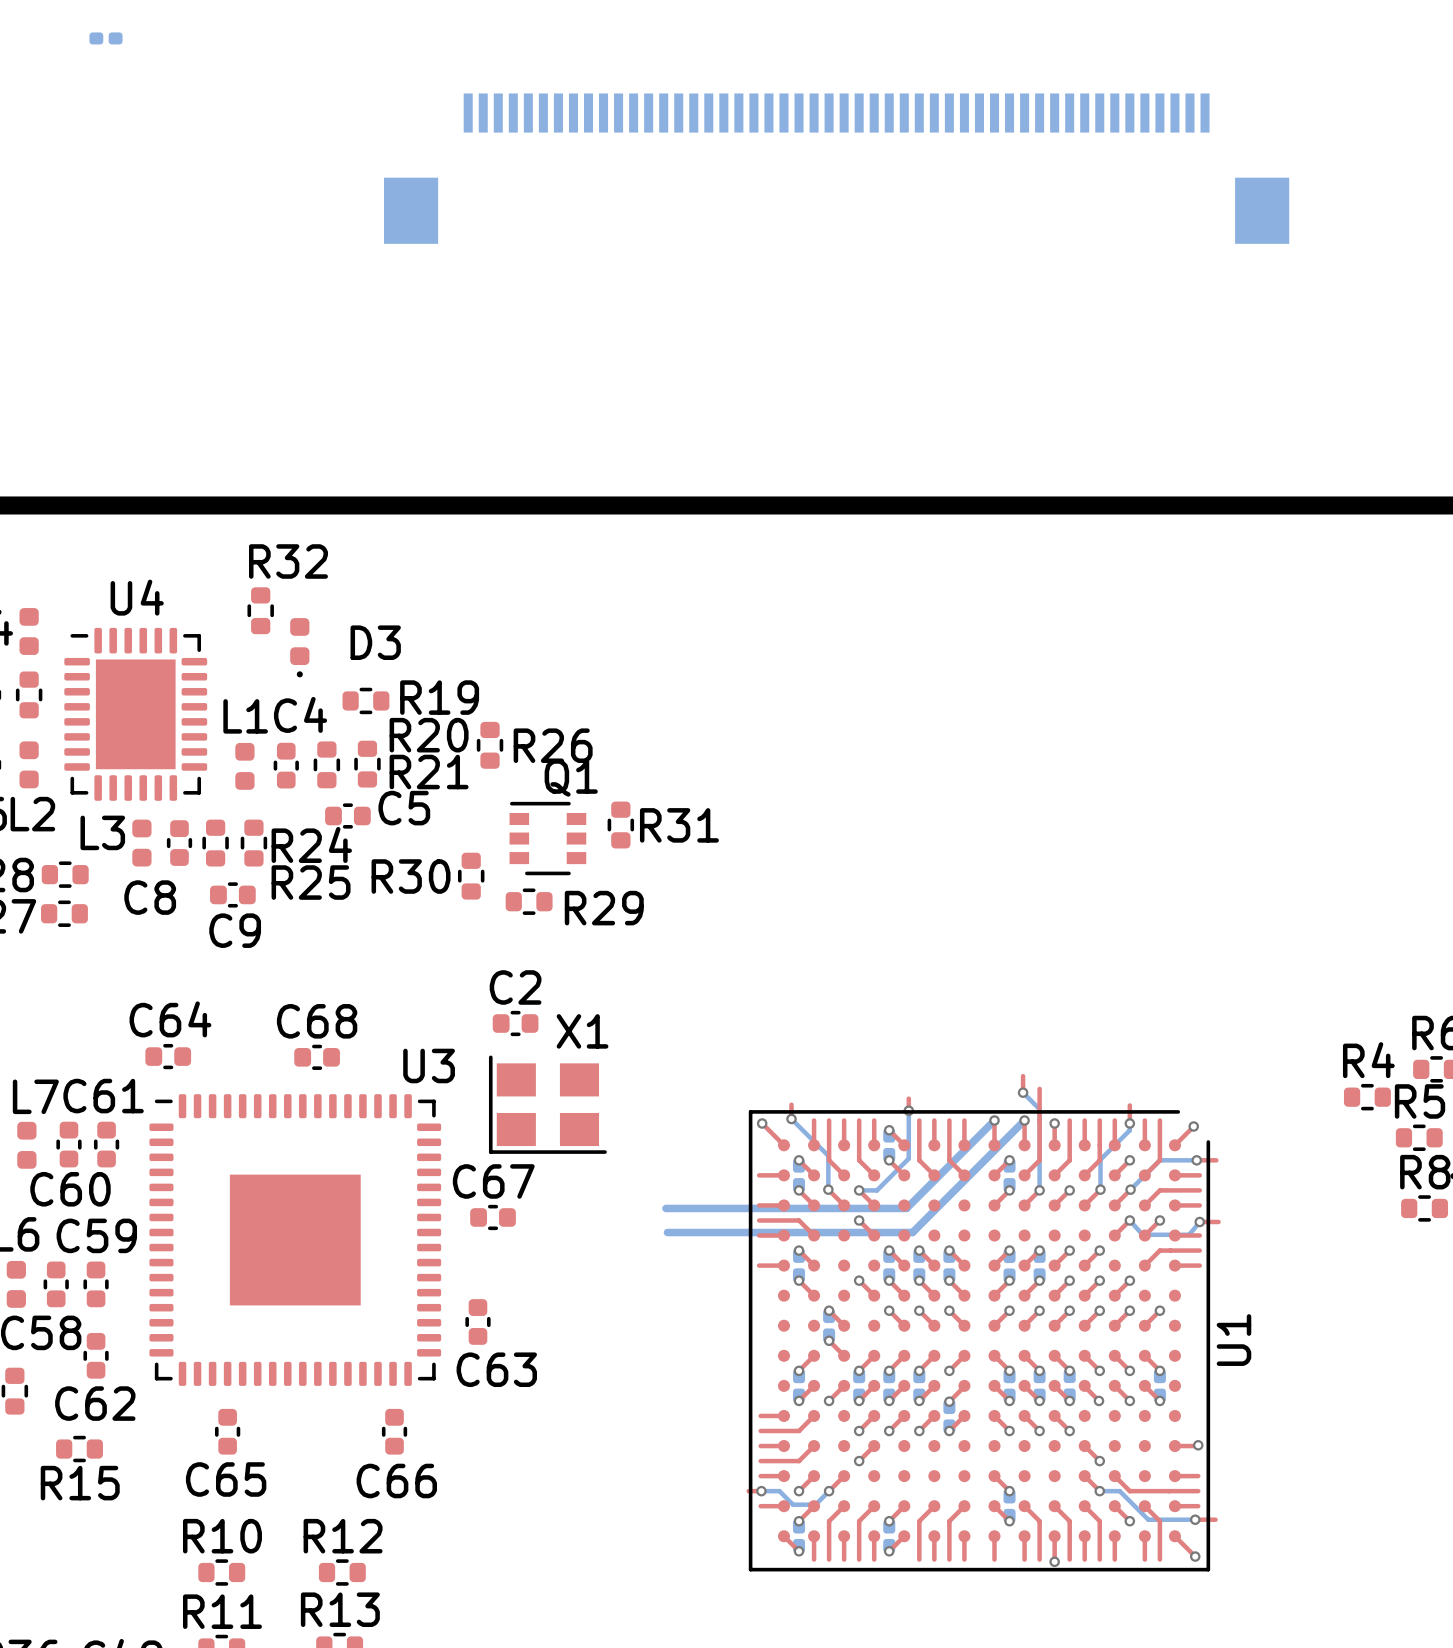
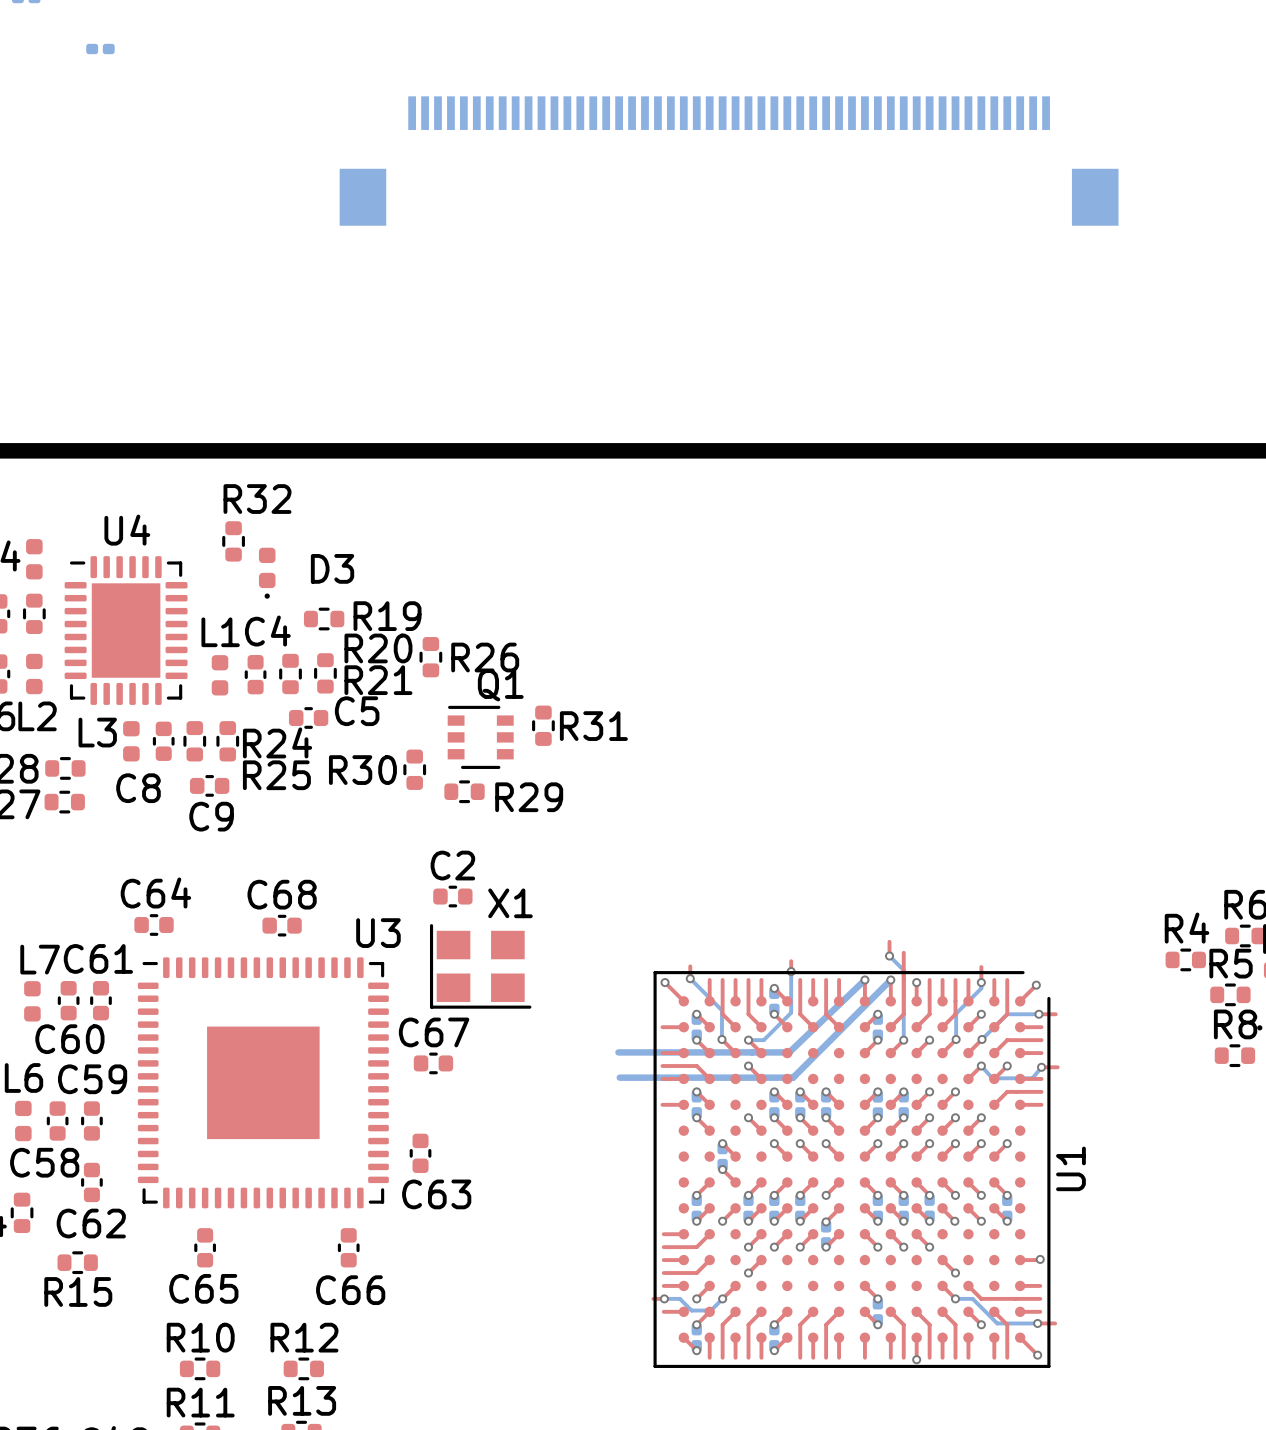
bottom track: (994, 1120) (906, 1208) (665, 1208) -> (864, 979) (789, 1052) (618, 1052)
bottom track: (667, 1232) (912, 1232) -> (619, 1077) (794, 1076)

